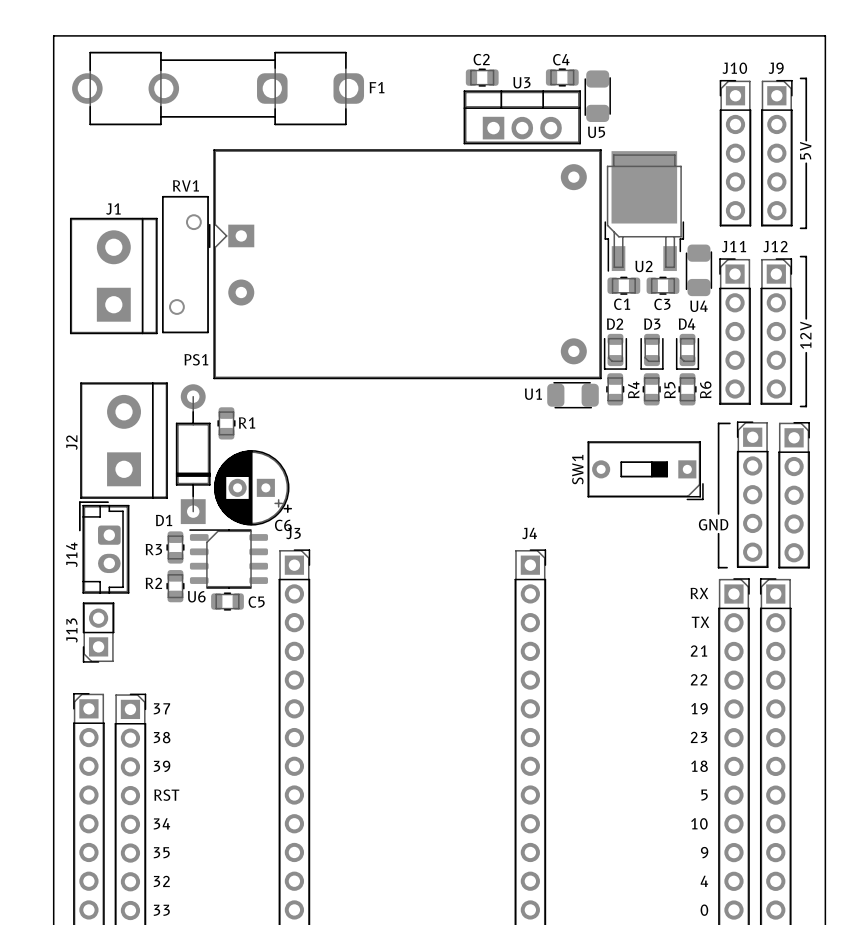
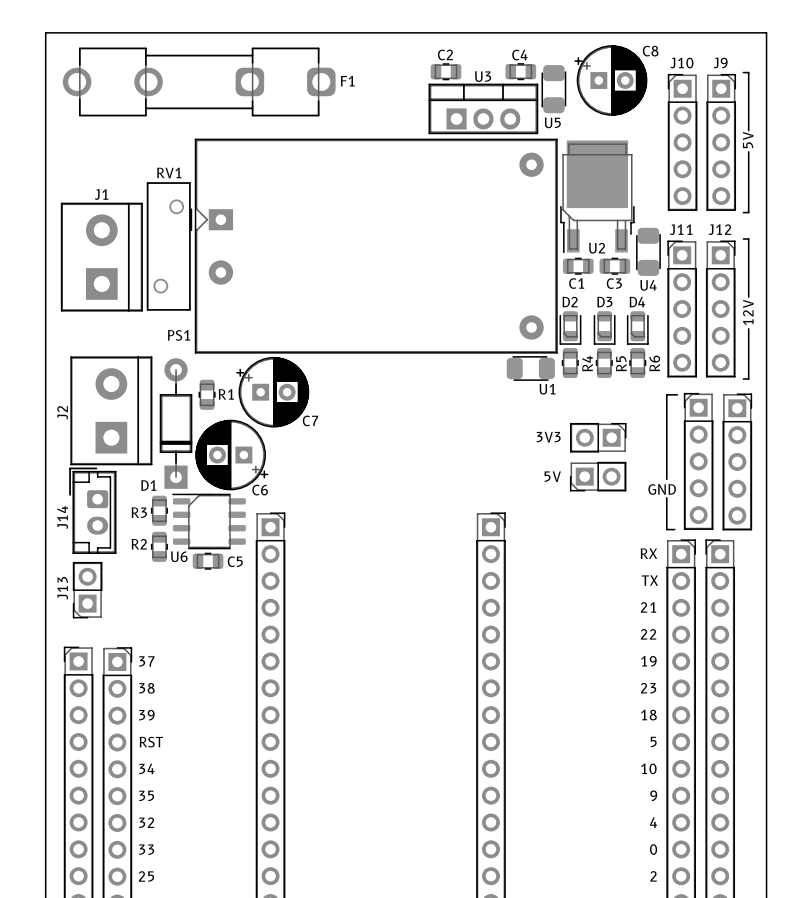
C8: none -> (610, 80)
U1 name position: U1 (533, 394) -> U1 (547, 389)
C7: none -> (272, 392)
part: none -> 3V3 (598, 437)
SW1: (645, 470) -> none
part: none -> 5V (598, 476)
J3 name: J3 (293, 533) -> none
J4 name: J4 (529, 533) -> none

